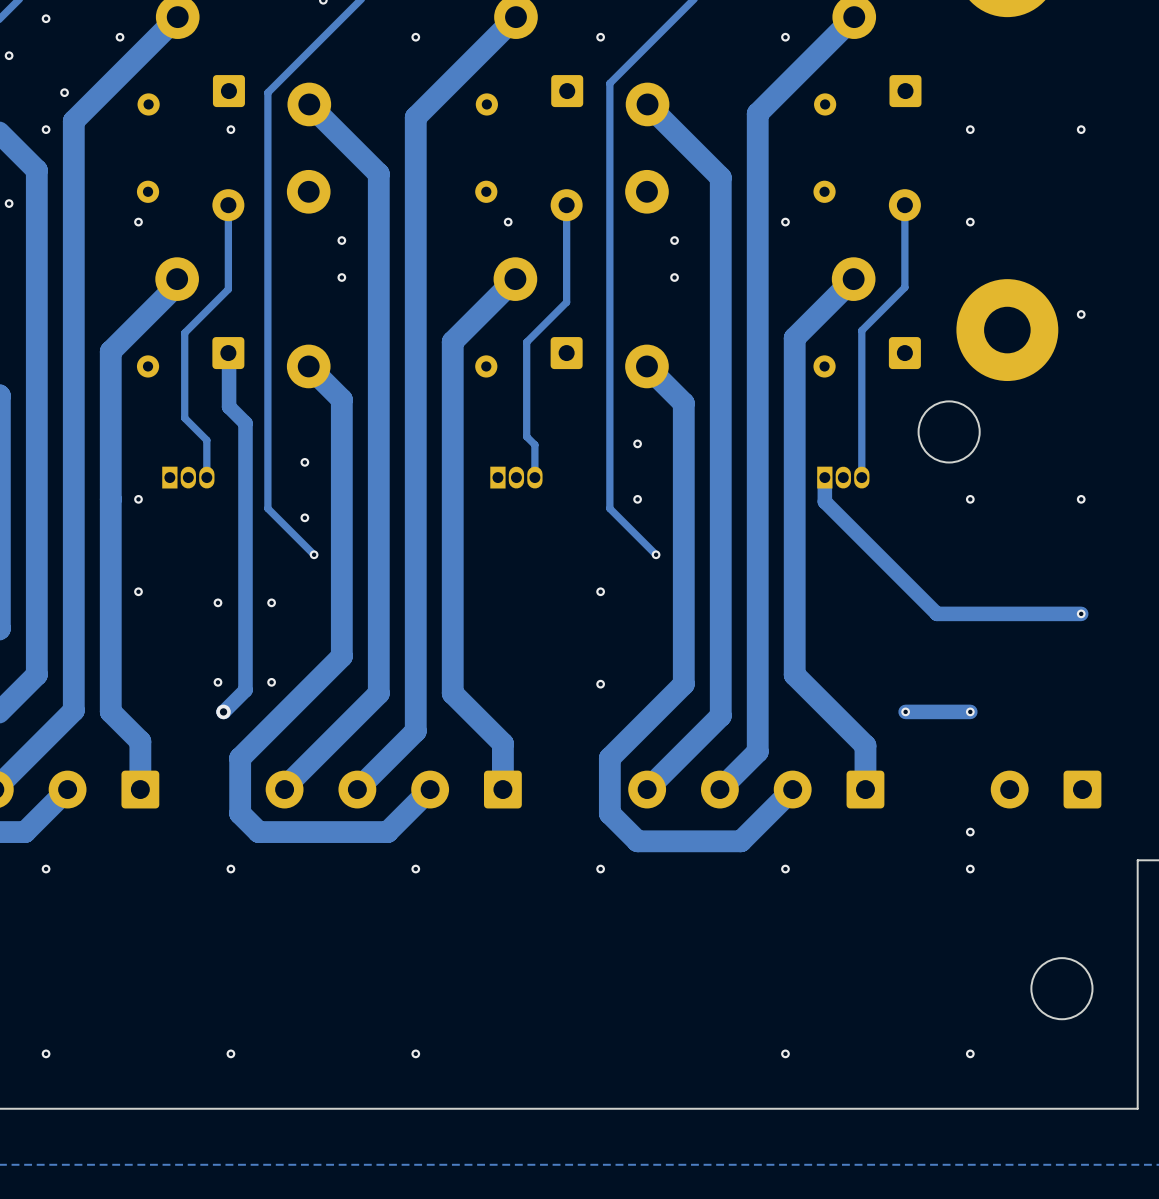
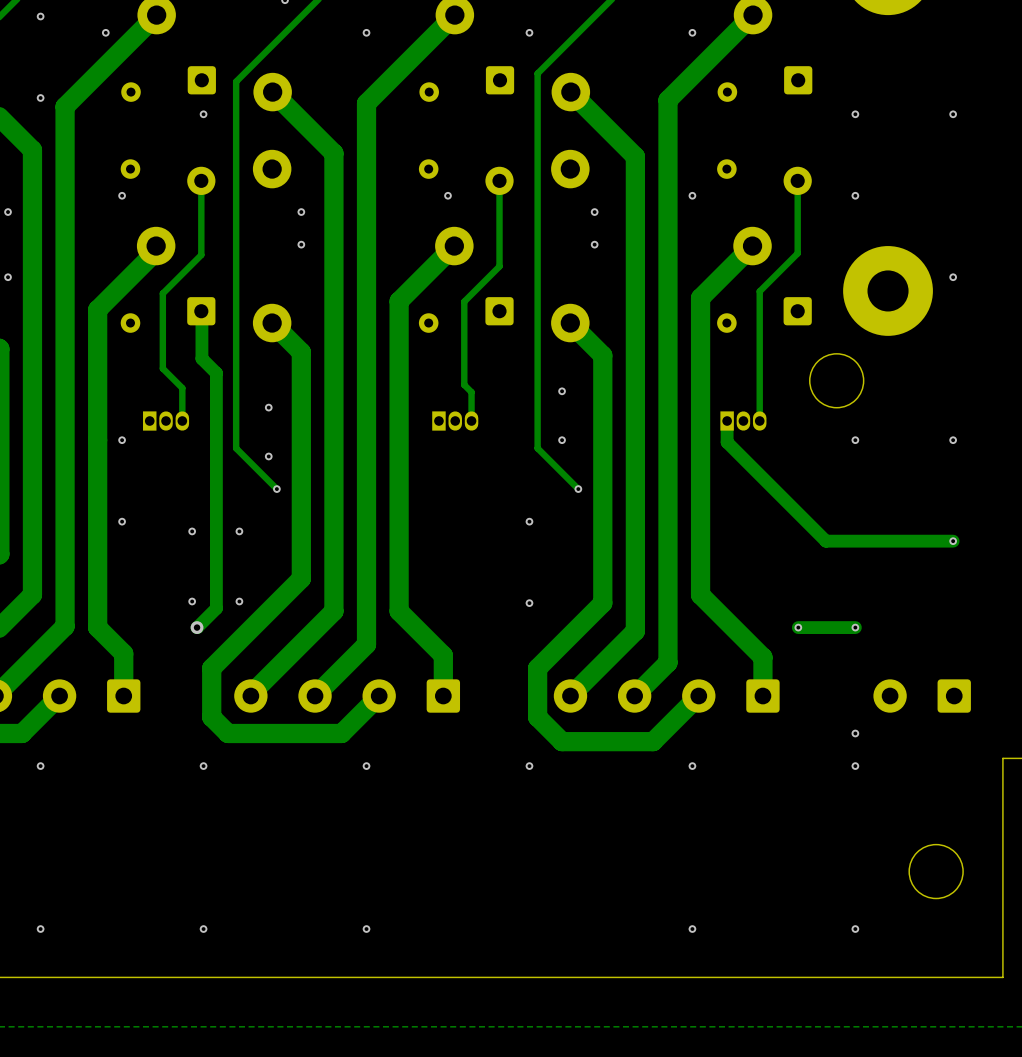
via: (9, 55) -> none
via: (64, 92) -> none
via: none -> (40, 97)
via: (46, 129) -> none
via position: (9, 203) -> (8, 212)
via: none -> (8, 277)

